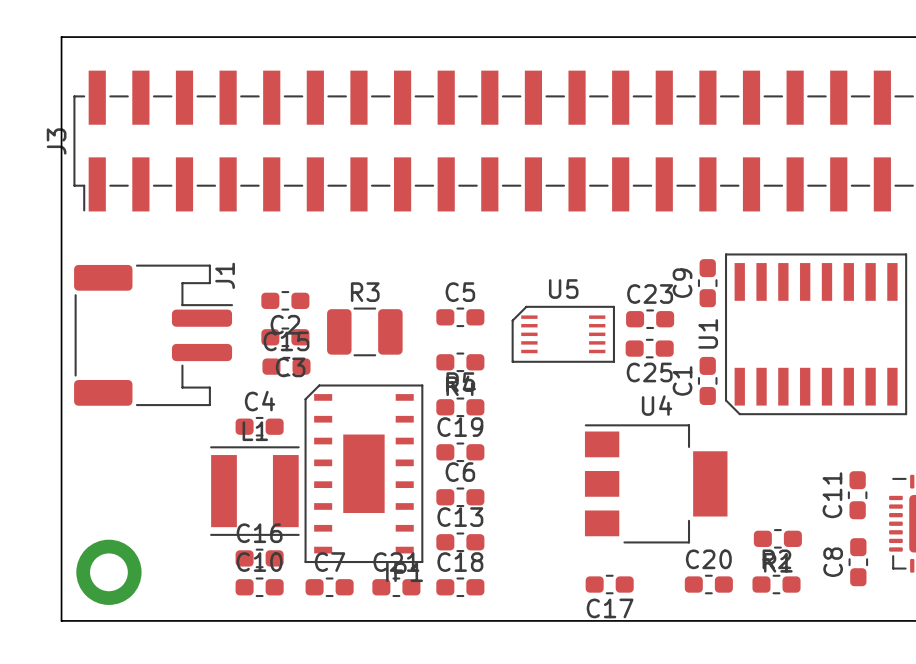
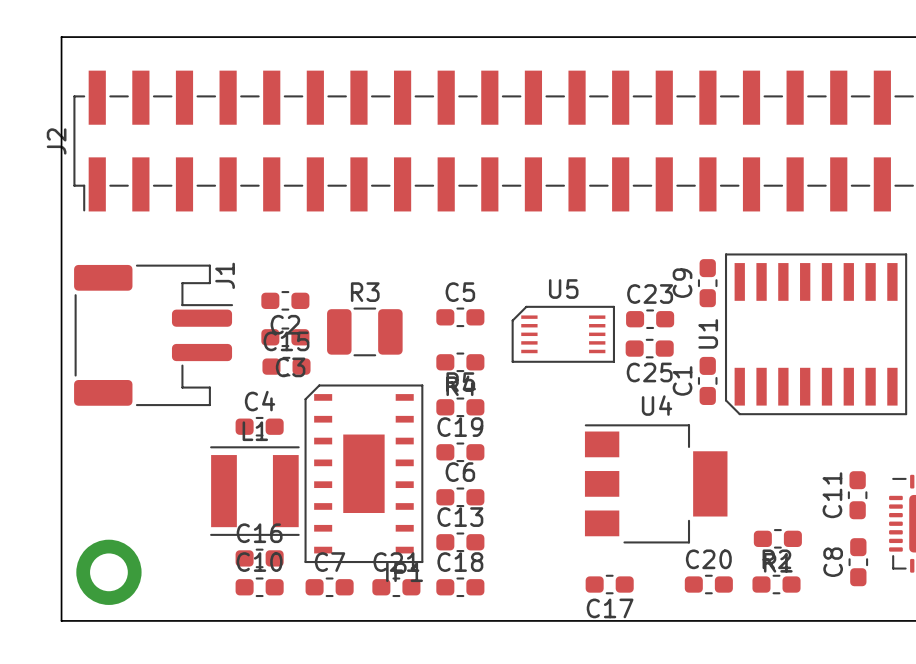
J3 name: J3 (56, 141) -> J2 (56, 141)

